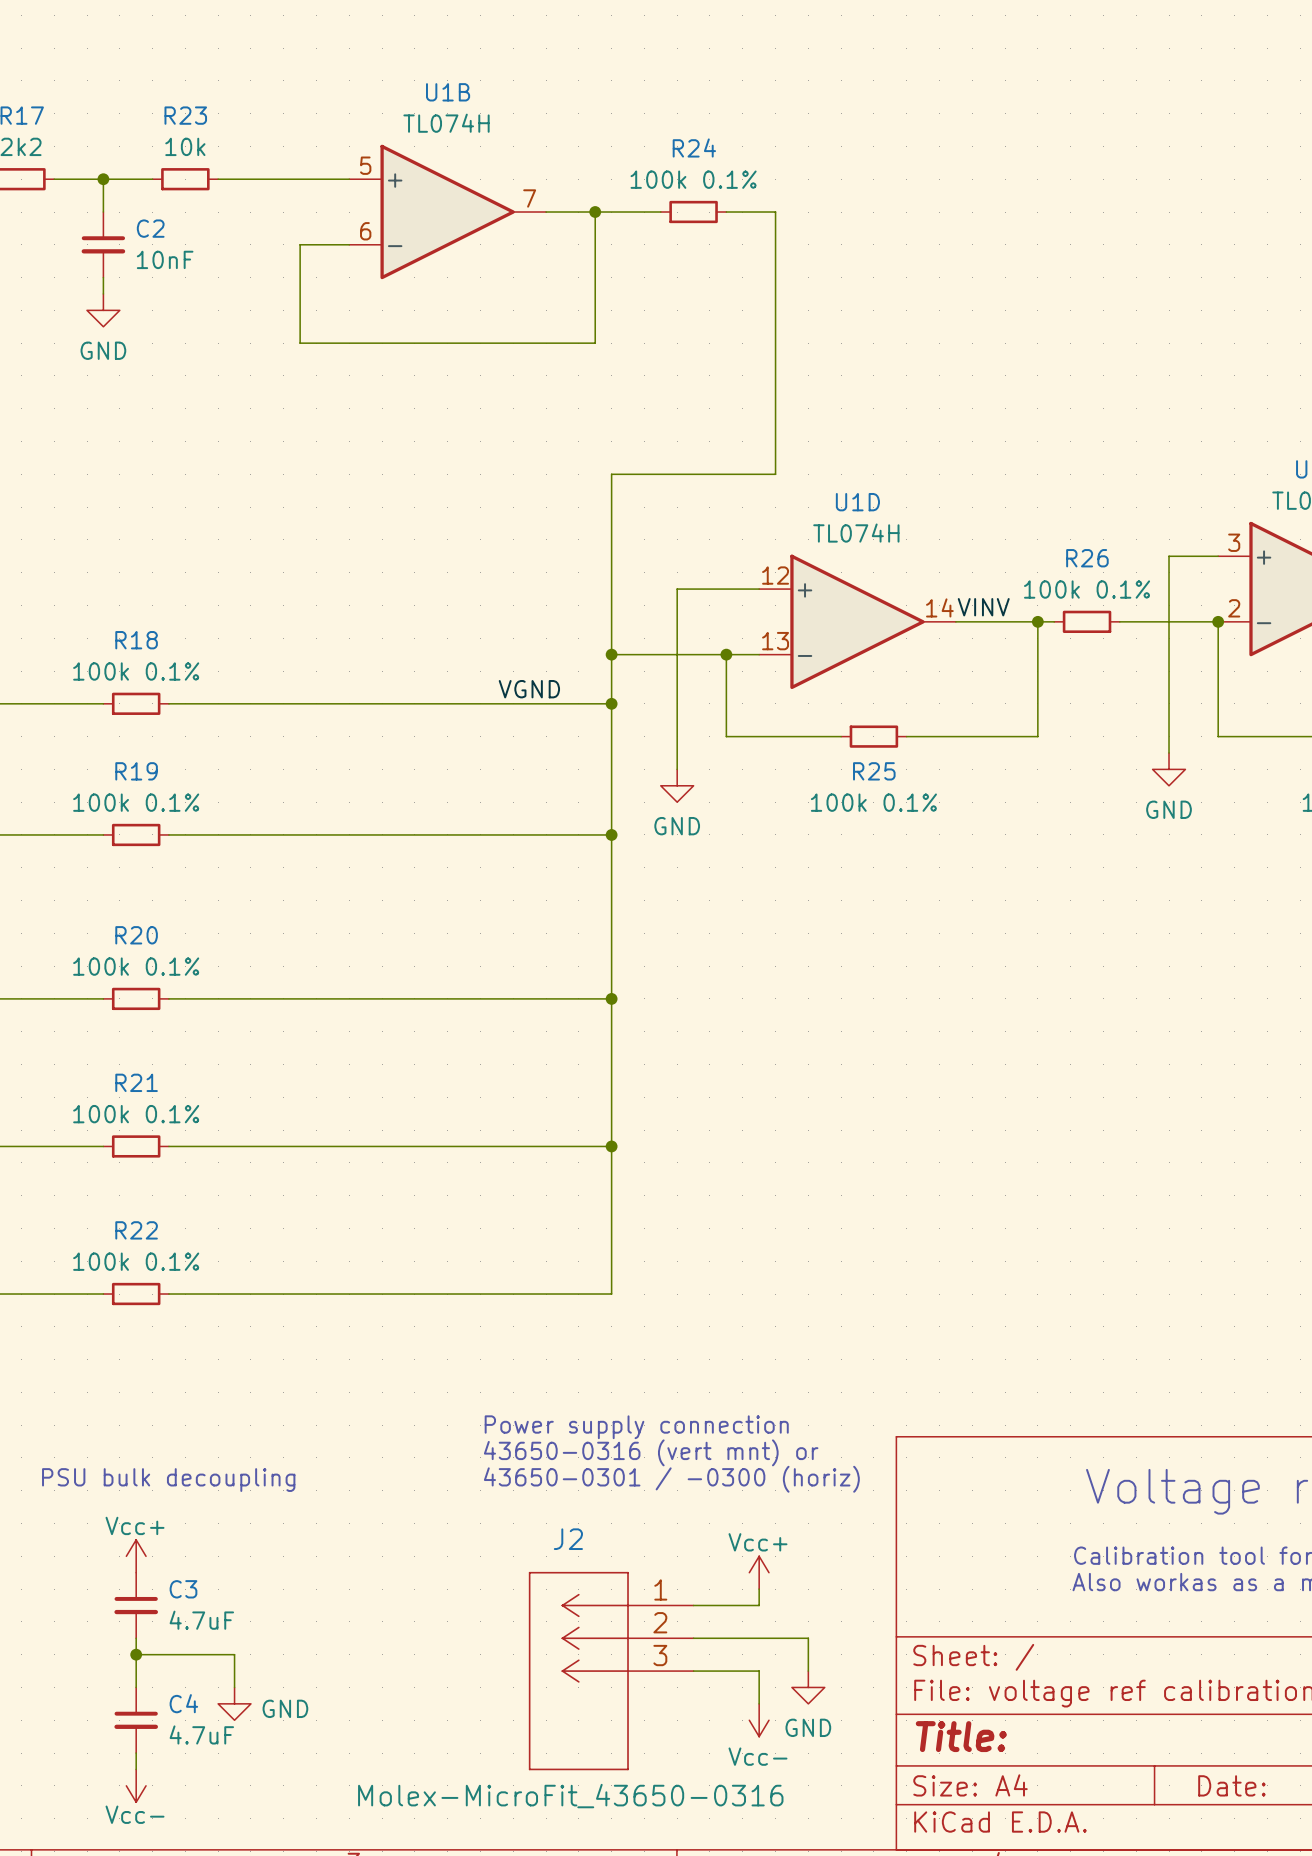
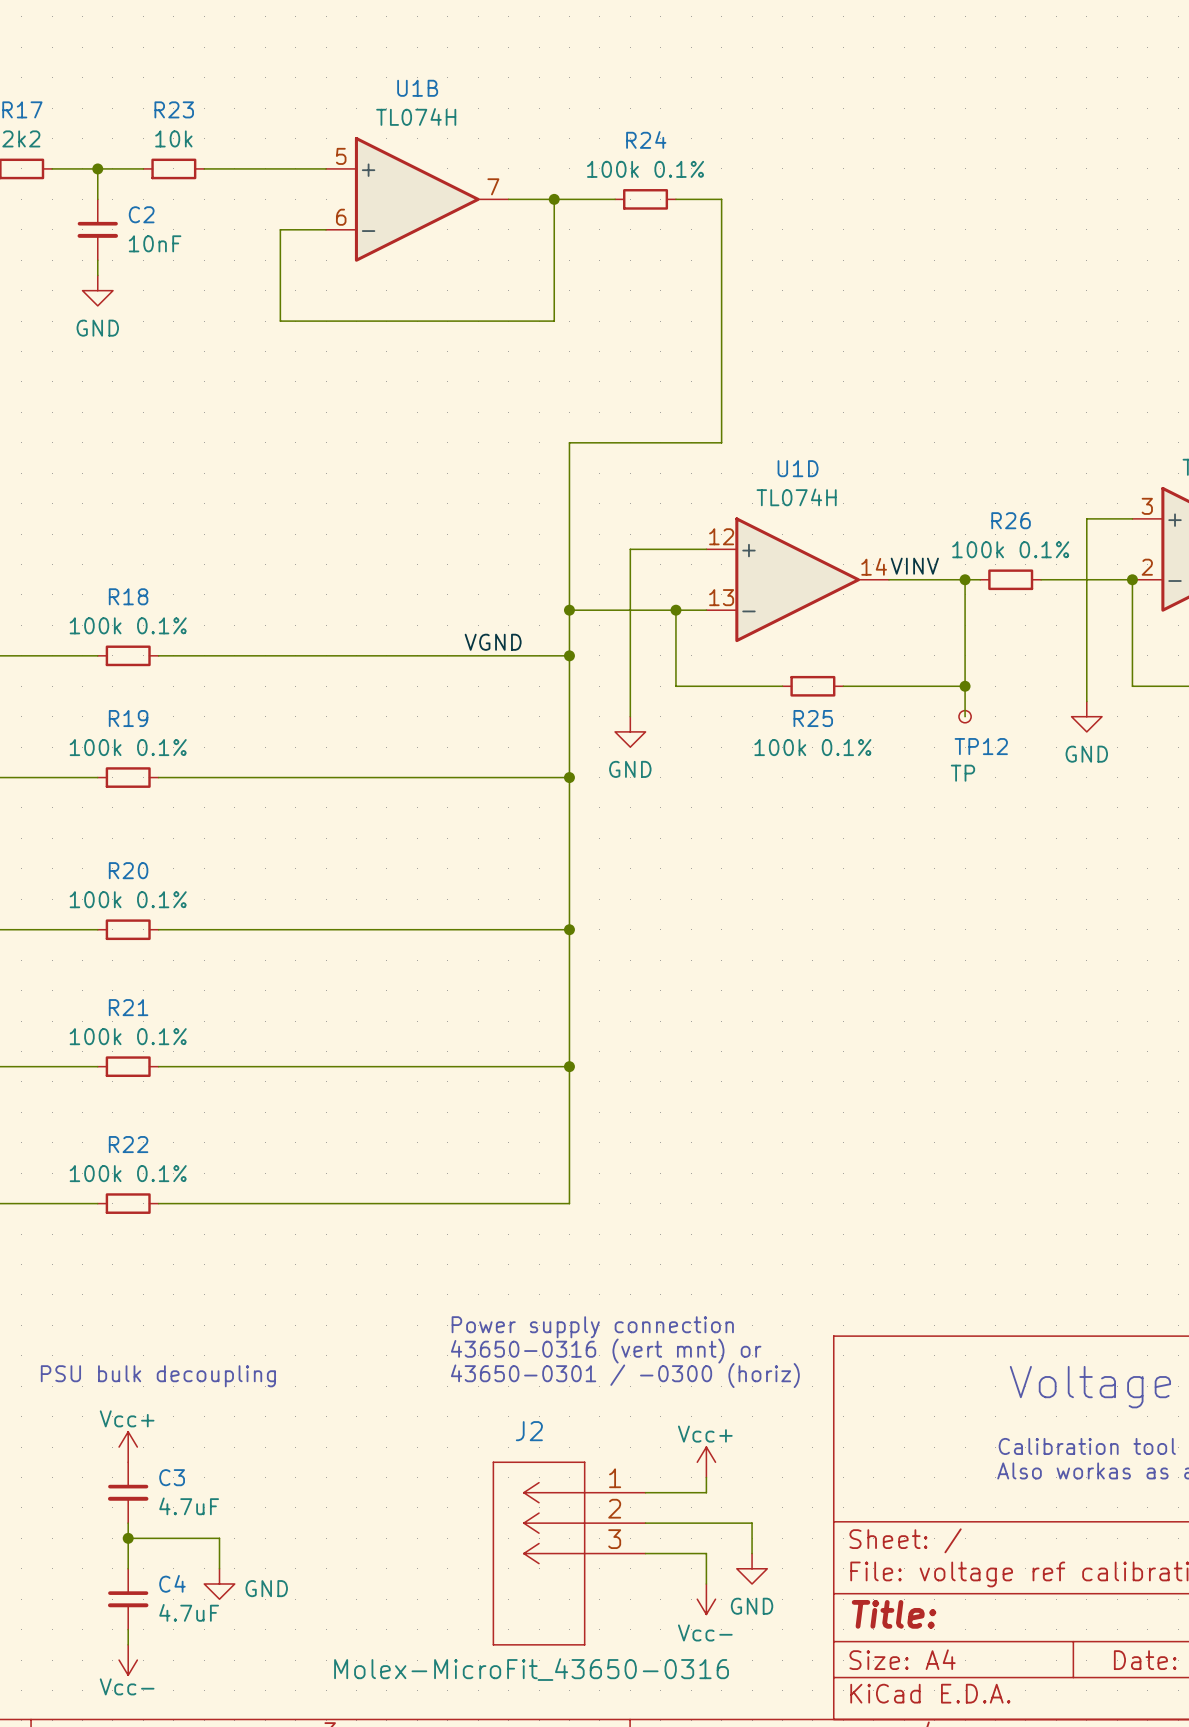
wire: none -> (965, 686) (965, 716)
junction: none -> (965, 686)
TP12: none -> TP (965, 716)

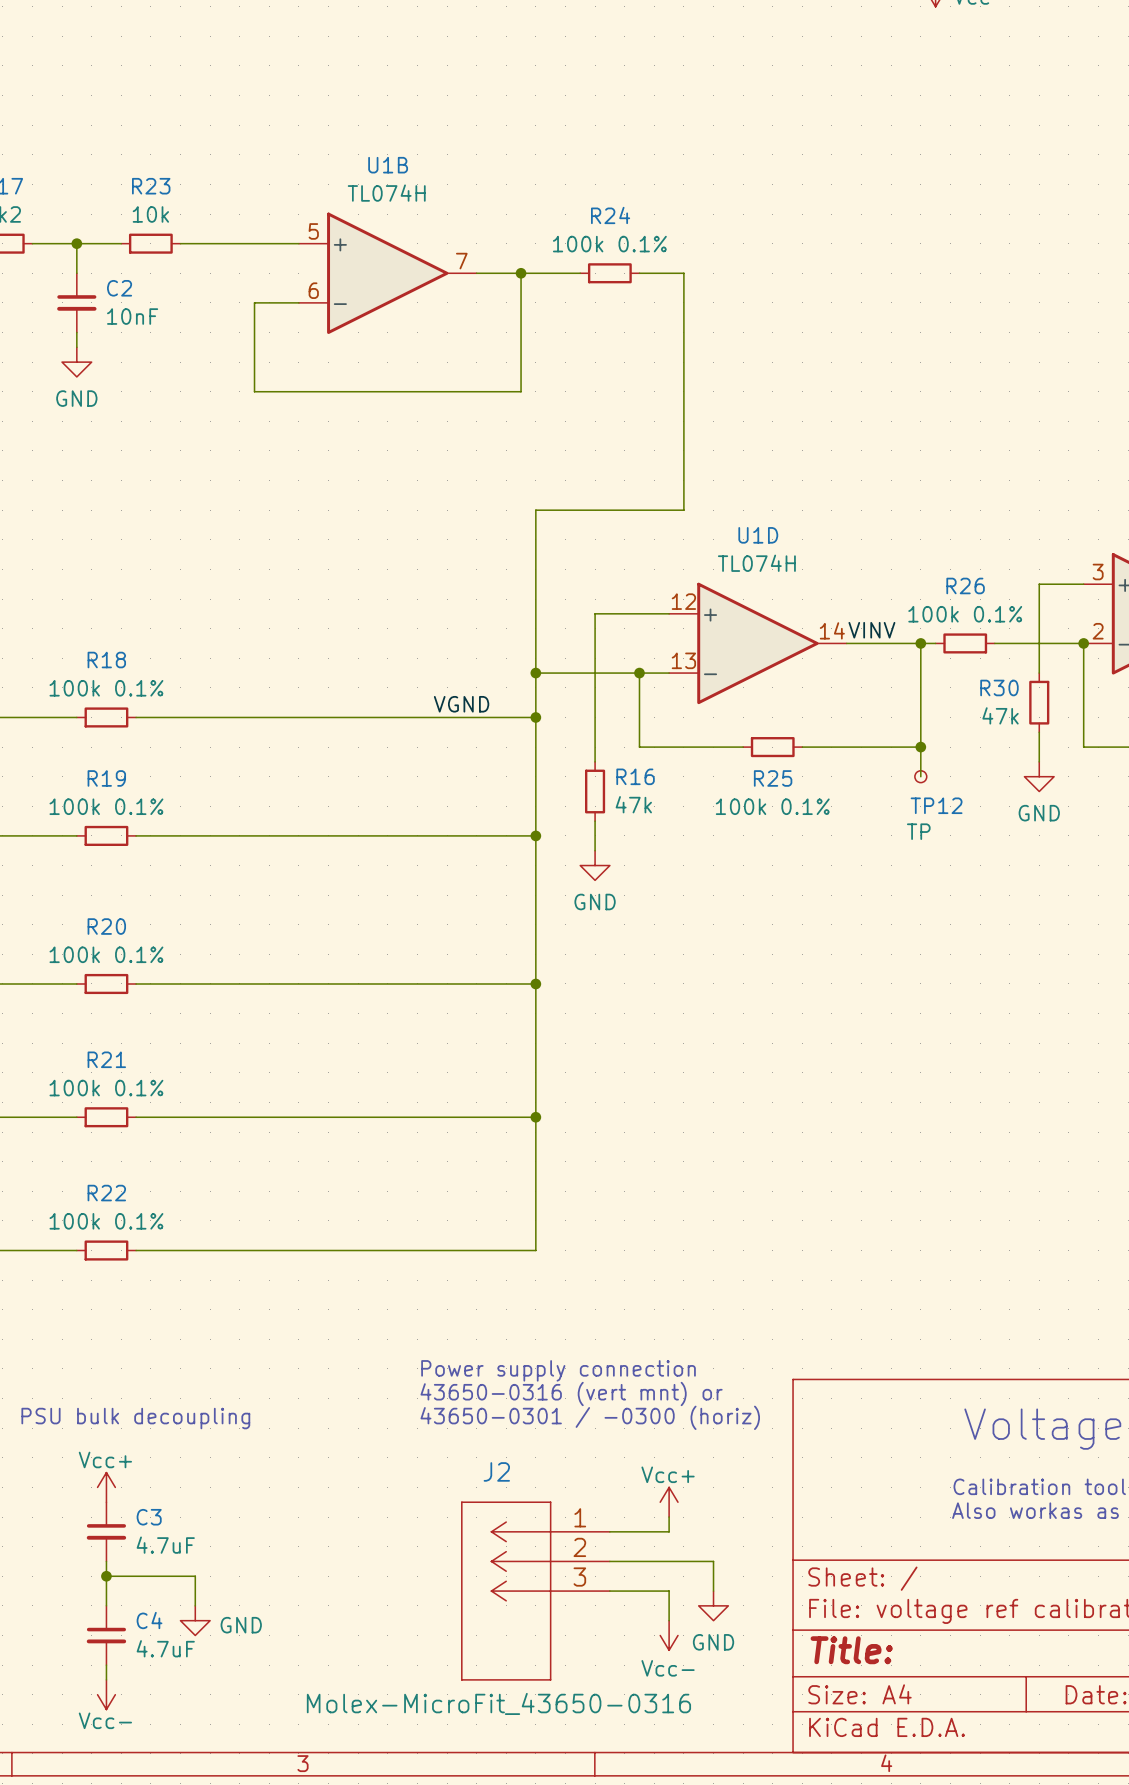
wire: (1086, 610) (1086, 671) -> none
R30: none -> 47k (1039, 702)
power symbol position: GND (630, 731) -> GND (595, 865)
R16: none -> 47k (595, 791)
wire: none -> (595, 821) (595, 850)

